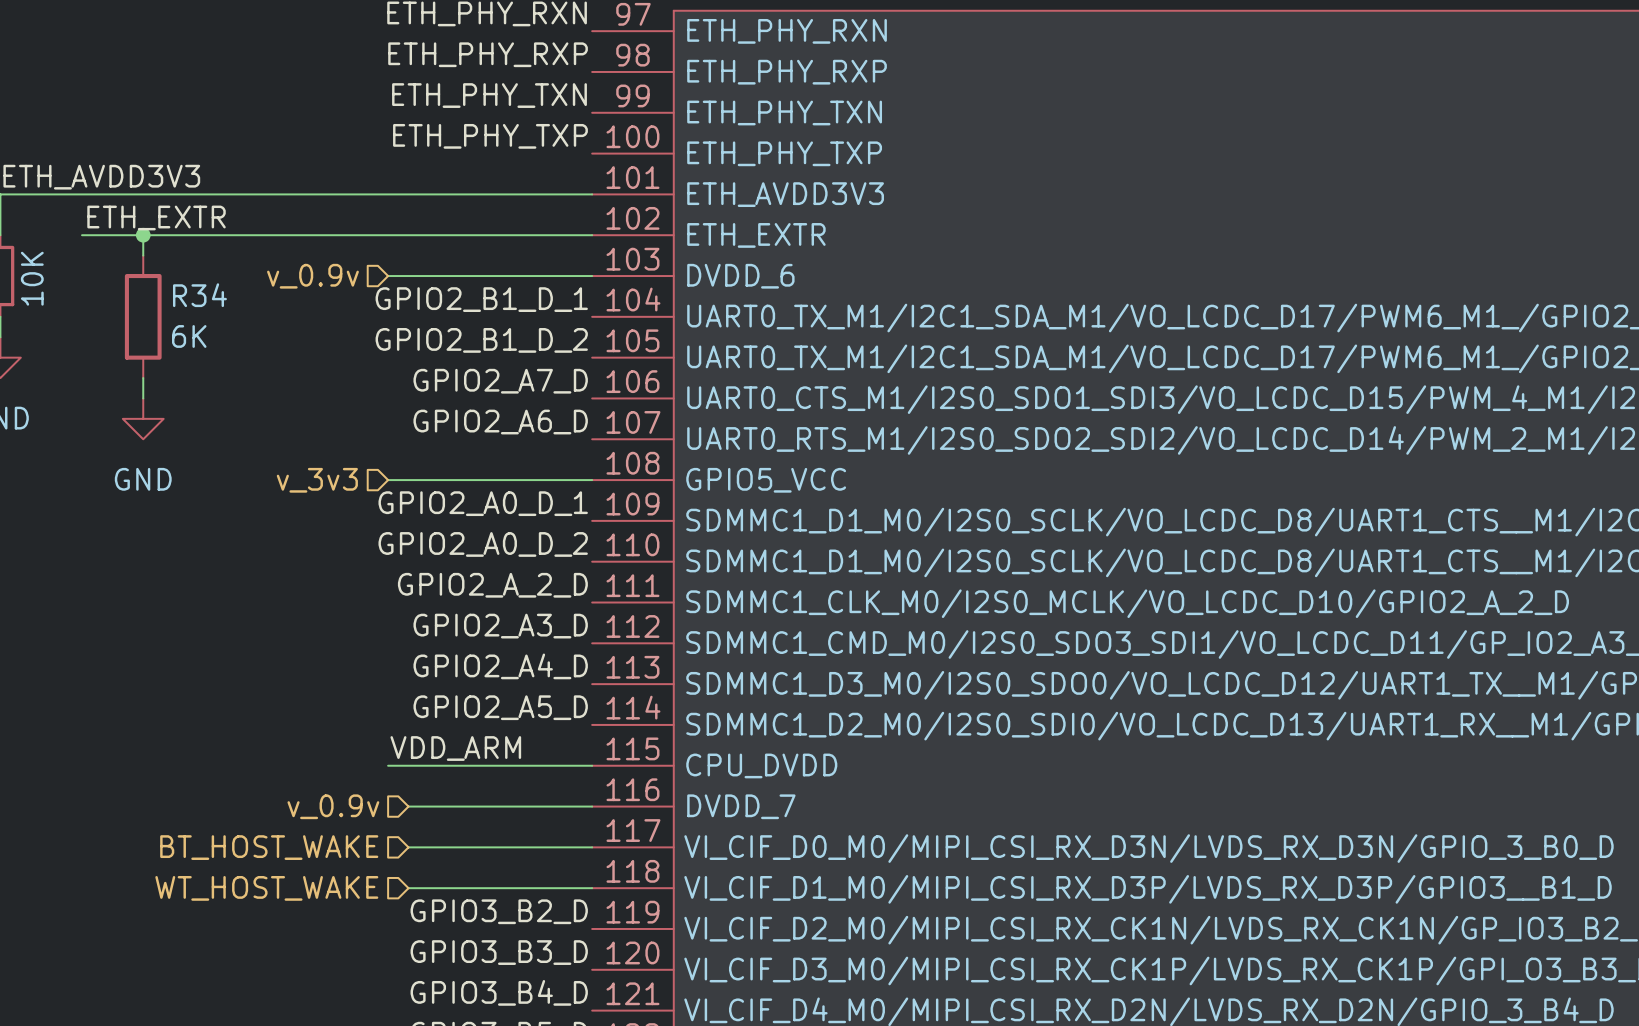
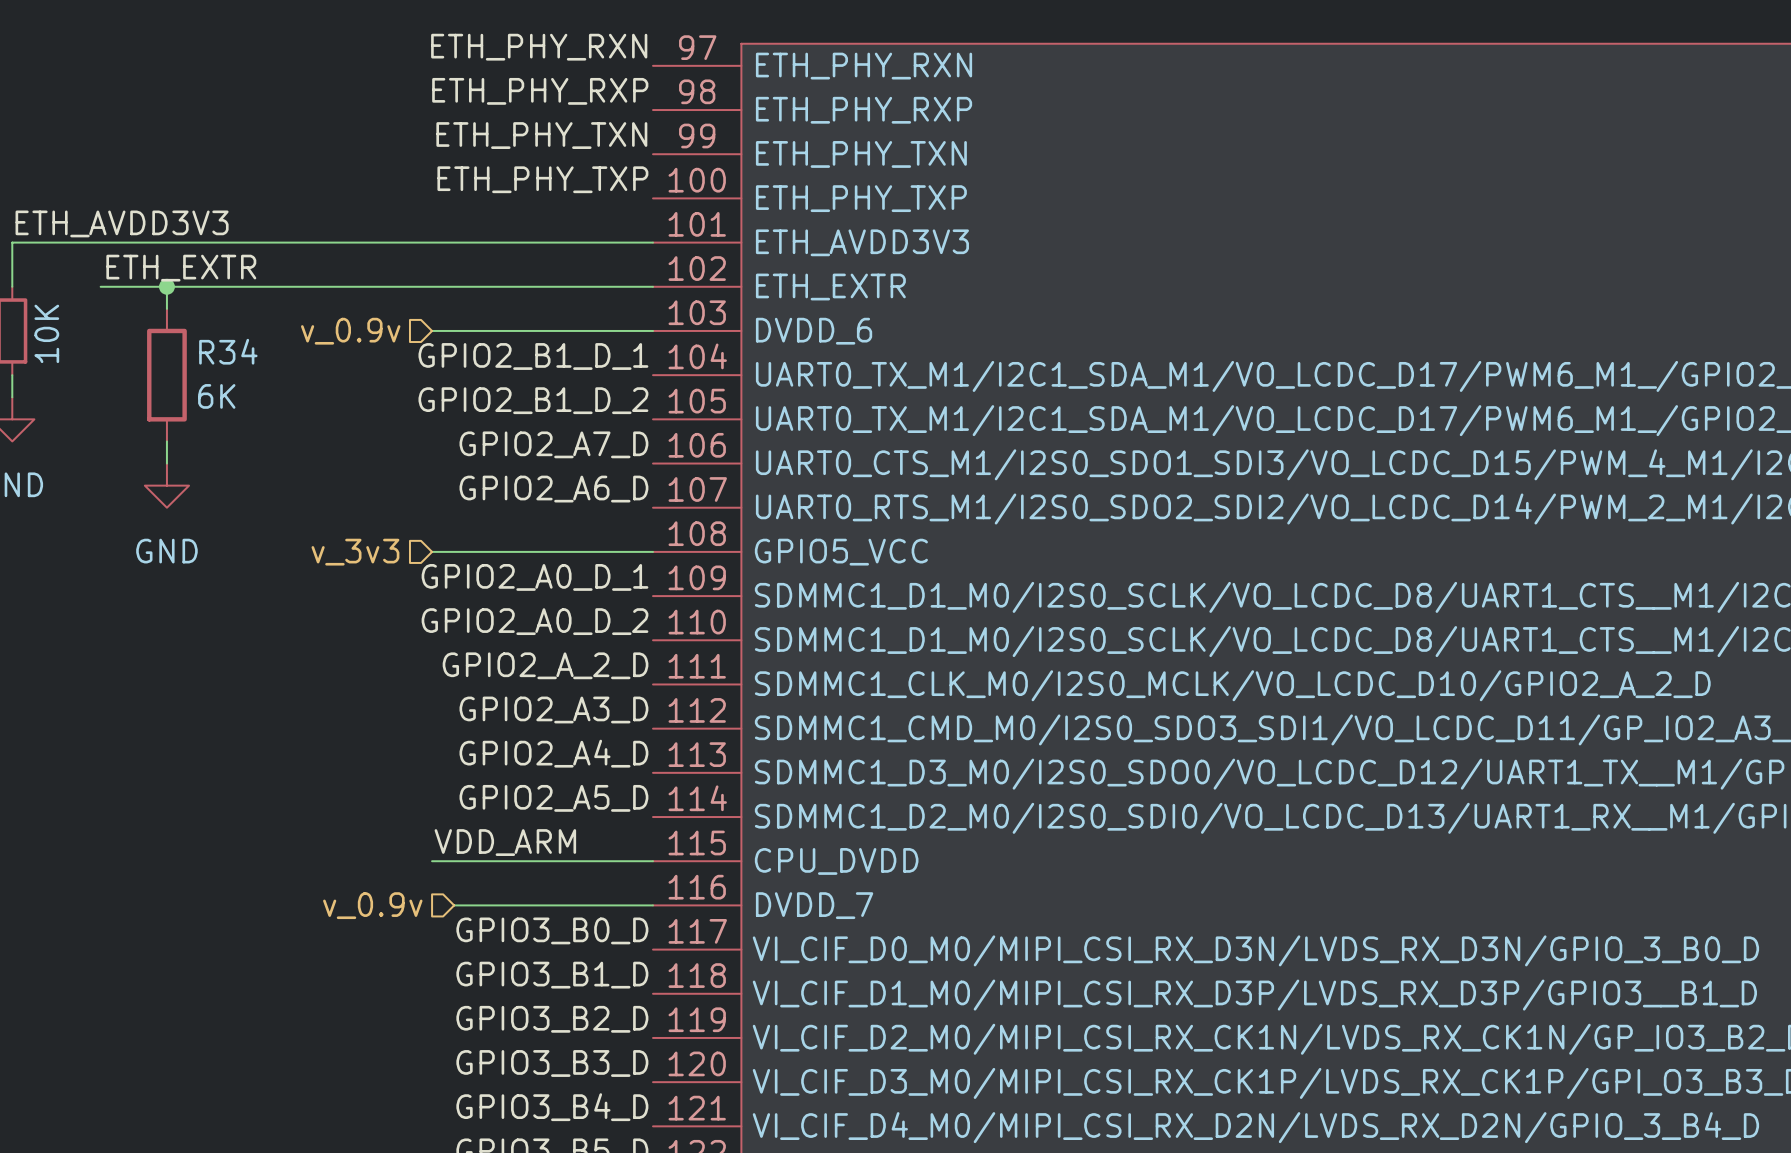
label: none -> GPIO3_B0_D (552, 930)
hierarchical label: BT_HOST_WAKE (269, 847) -> none
wire: (408, 847) (592, 847) -> none
label: none -> GPIO3_B1_D (552, 975)
hierarchical label: WT_HOST_WAKE (266, 888) -> none
wire: (408, 888) (592, 888) -> none

